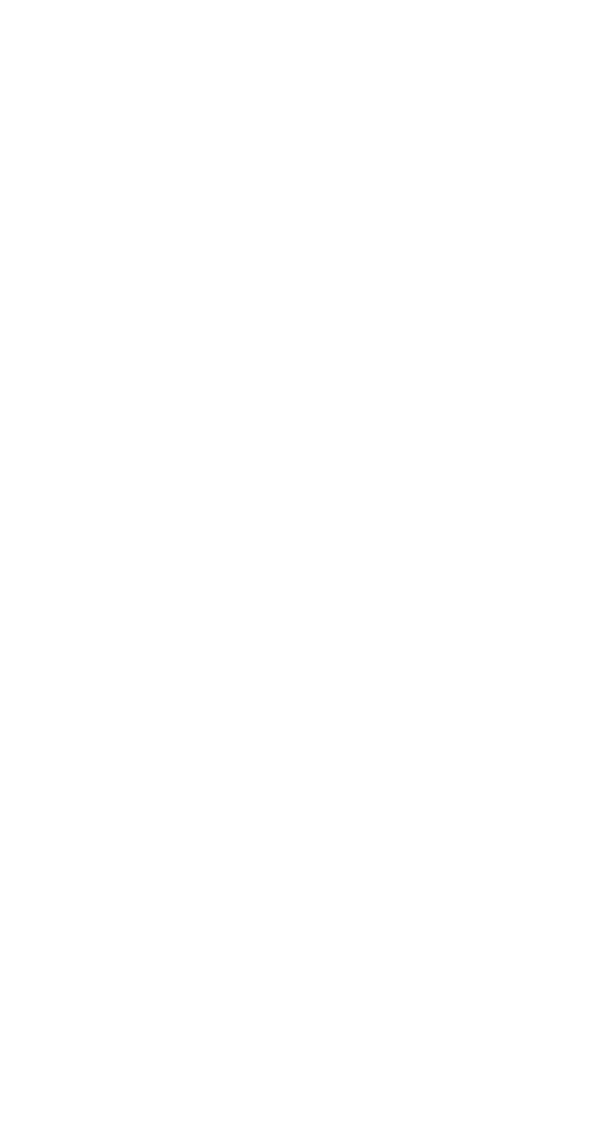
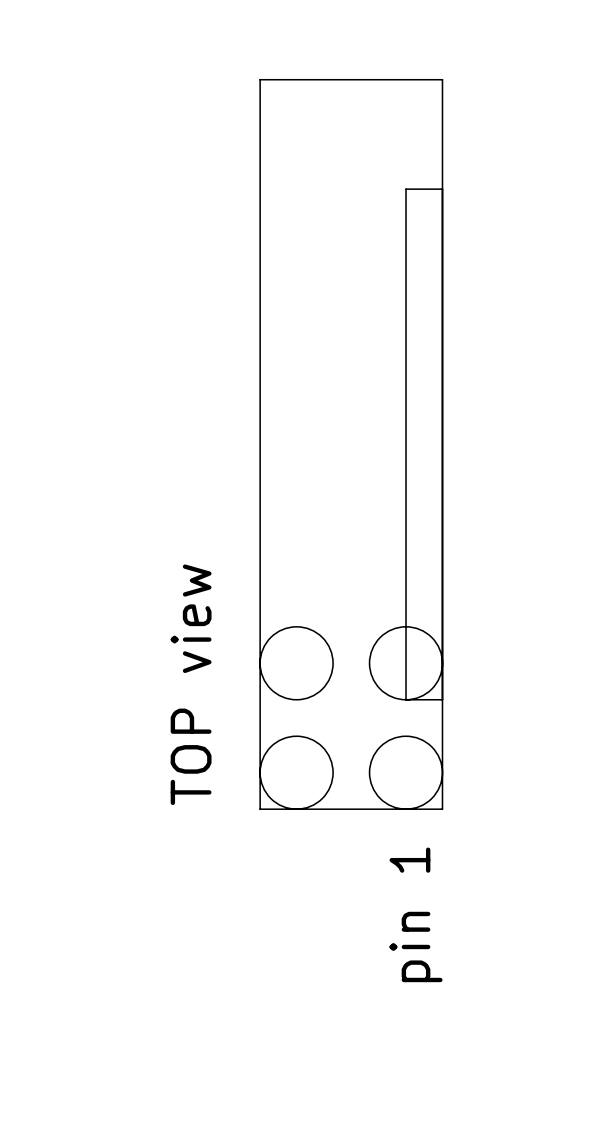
line: none -> (260, 79) (442, 79) (442, 809) (260, 809) (260, 79)
line: none -> (442, 189) (406, 189) (406, 699) (442, 699)
drawing: none -> [260, 626, 334, 700]
drawing: none -> [369, 626, 443, 700]
label: none -> TOP view (191, 684)
drawing: none -> [260, 736, 334, 810]
drawing: none -> [369, 736, 443, 810]
label: none -> pin 1 (416, 914)

